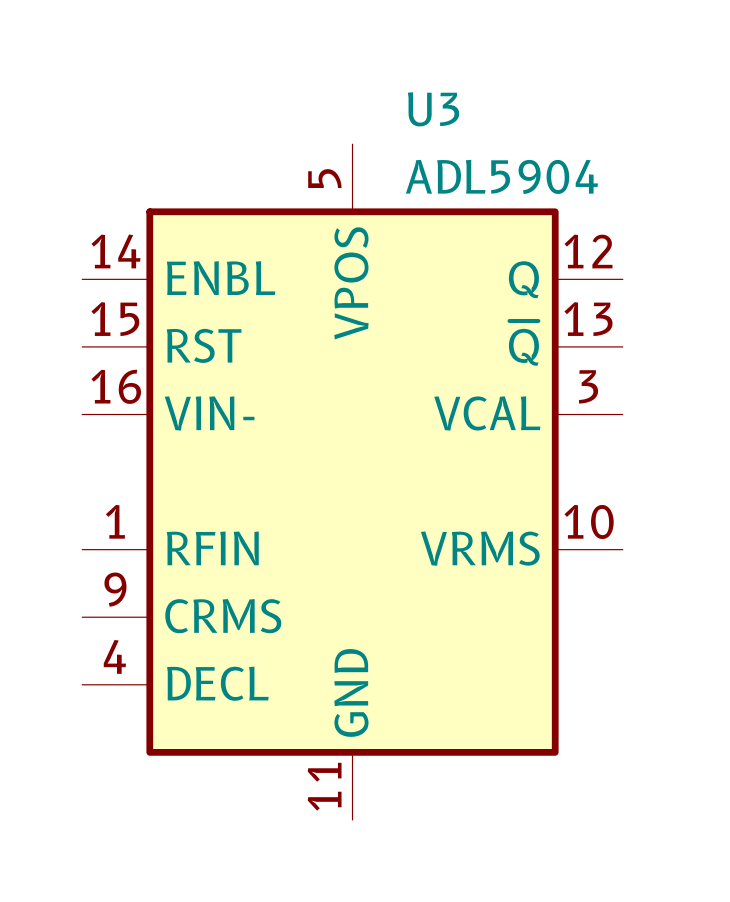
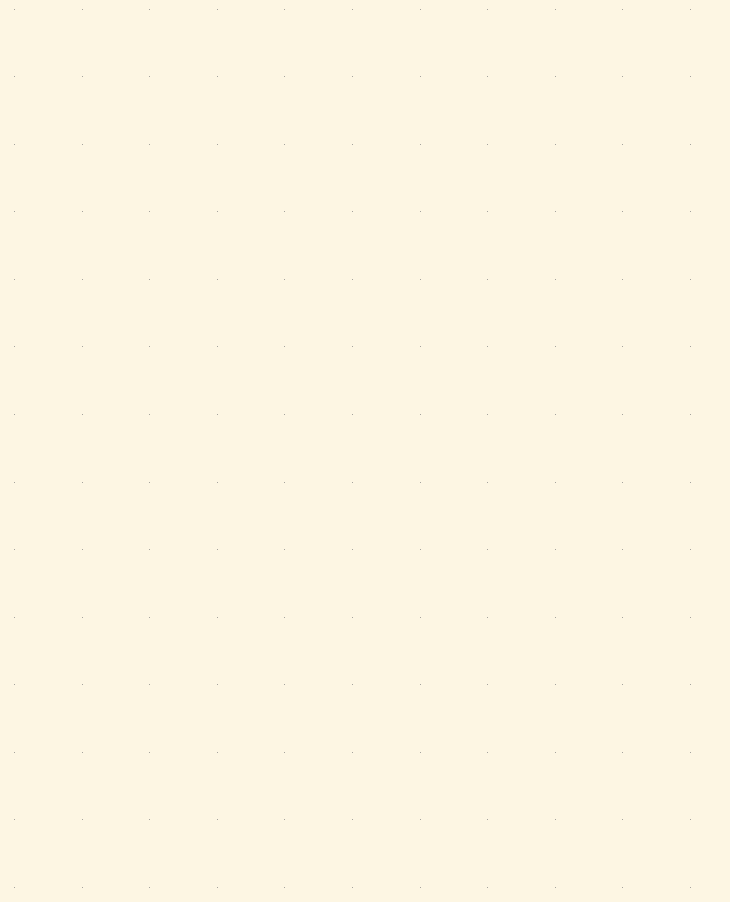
U3: ADL5904 (352, 482) -> none

